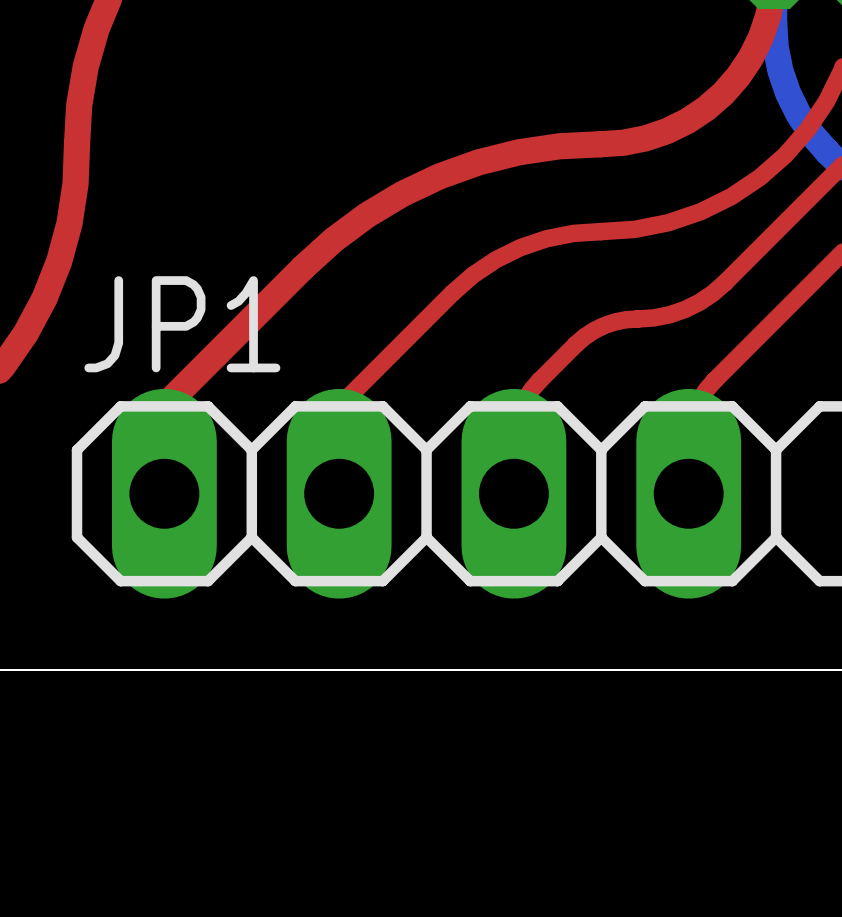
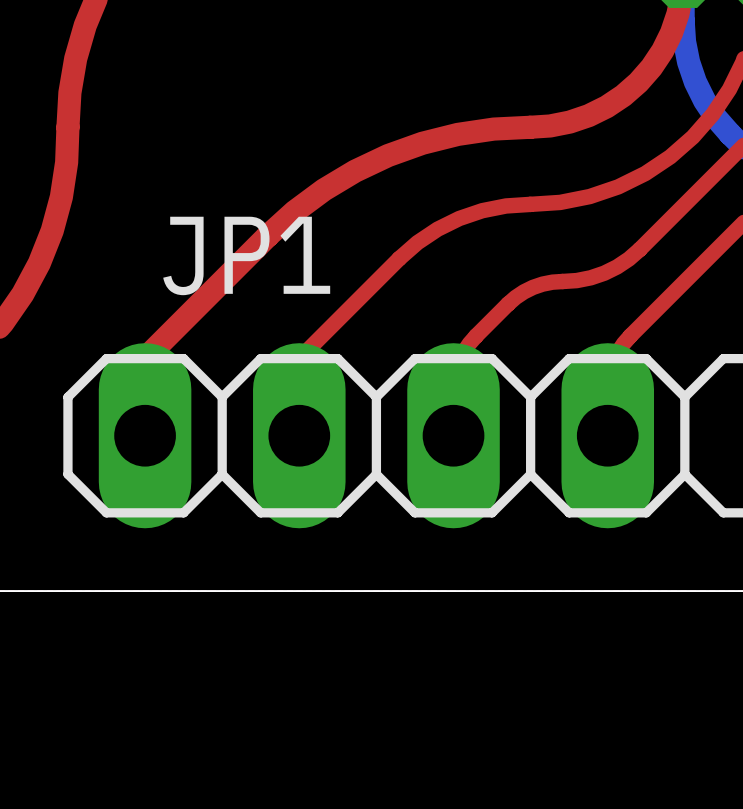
JP1 name position: JP1 (182, 324) -> JP1 (246, 255)

